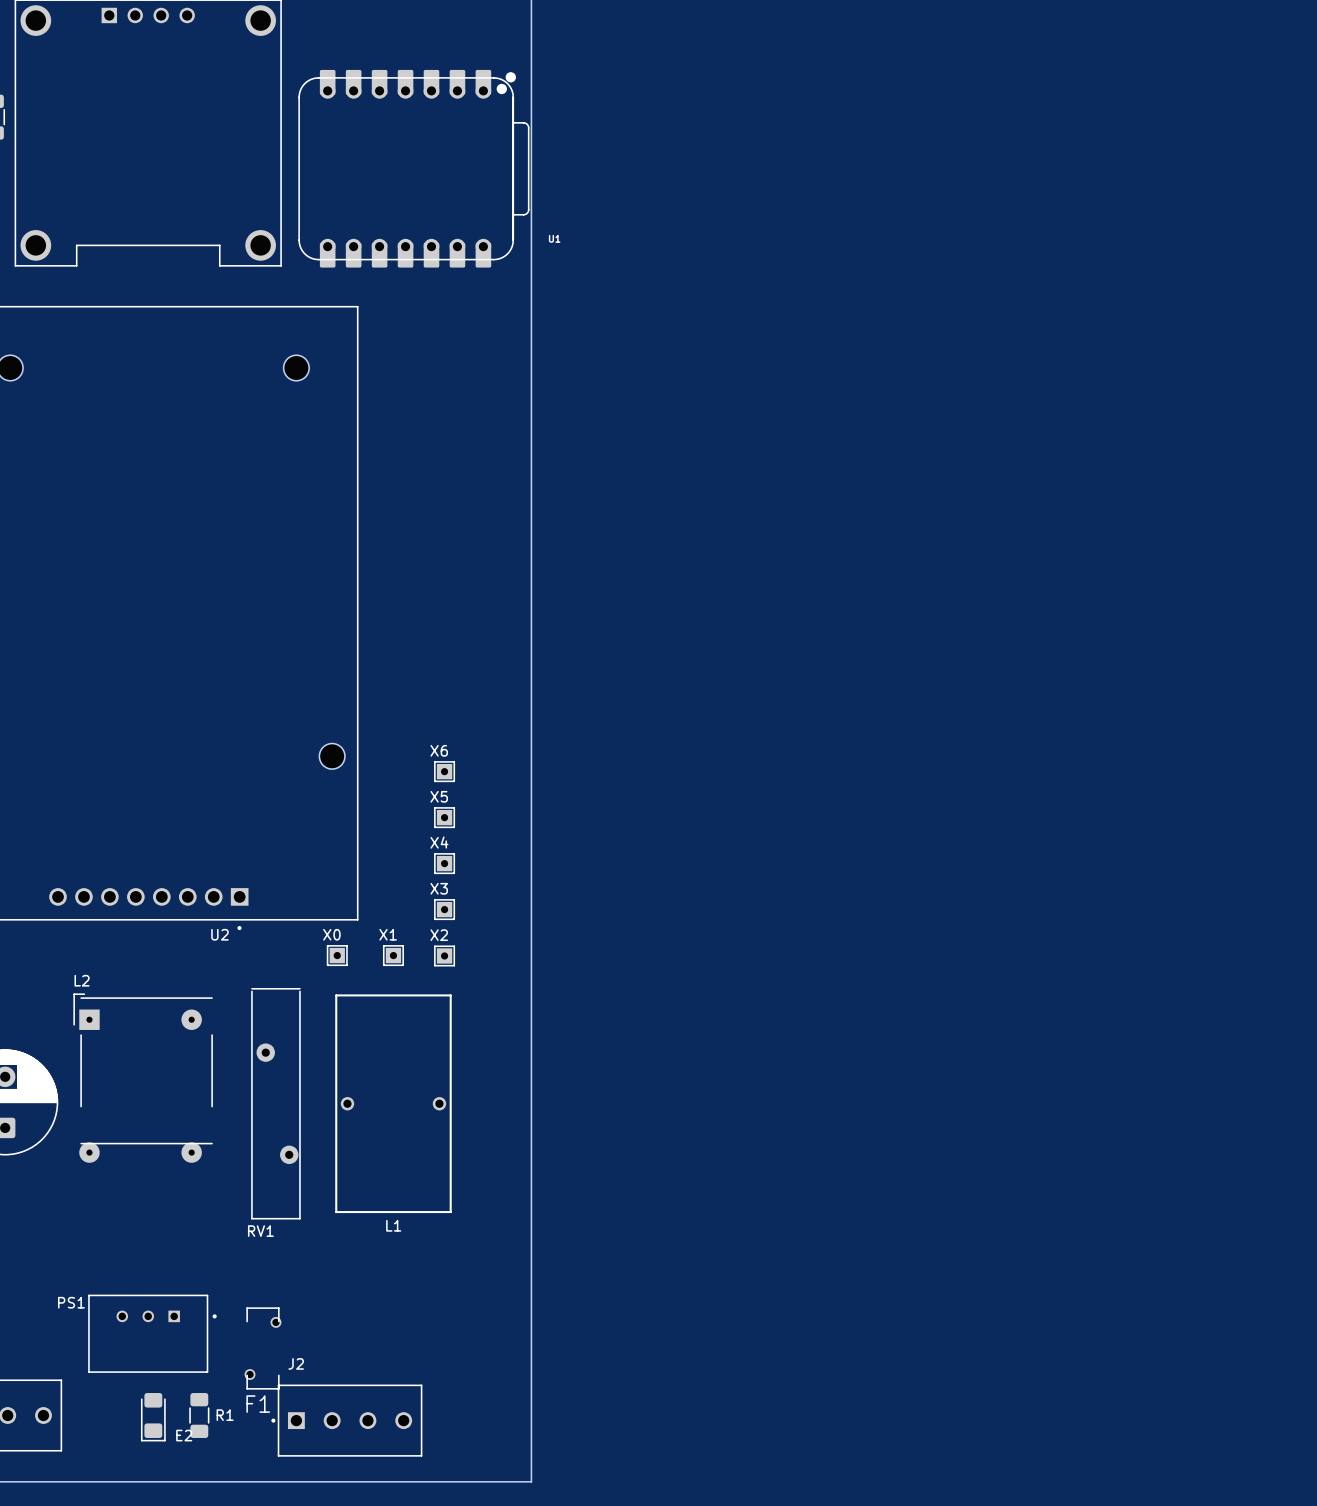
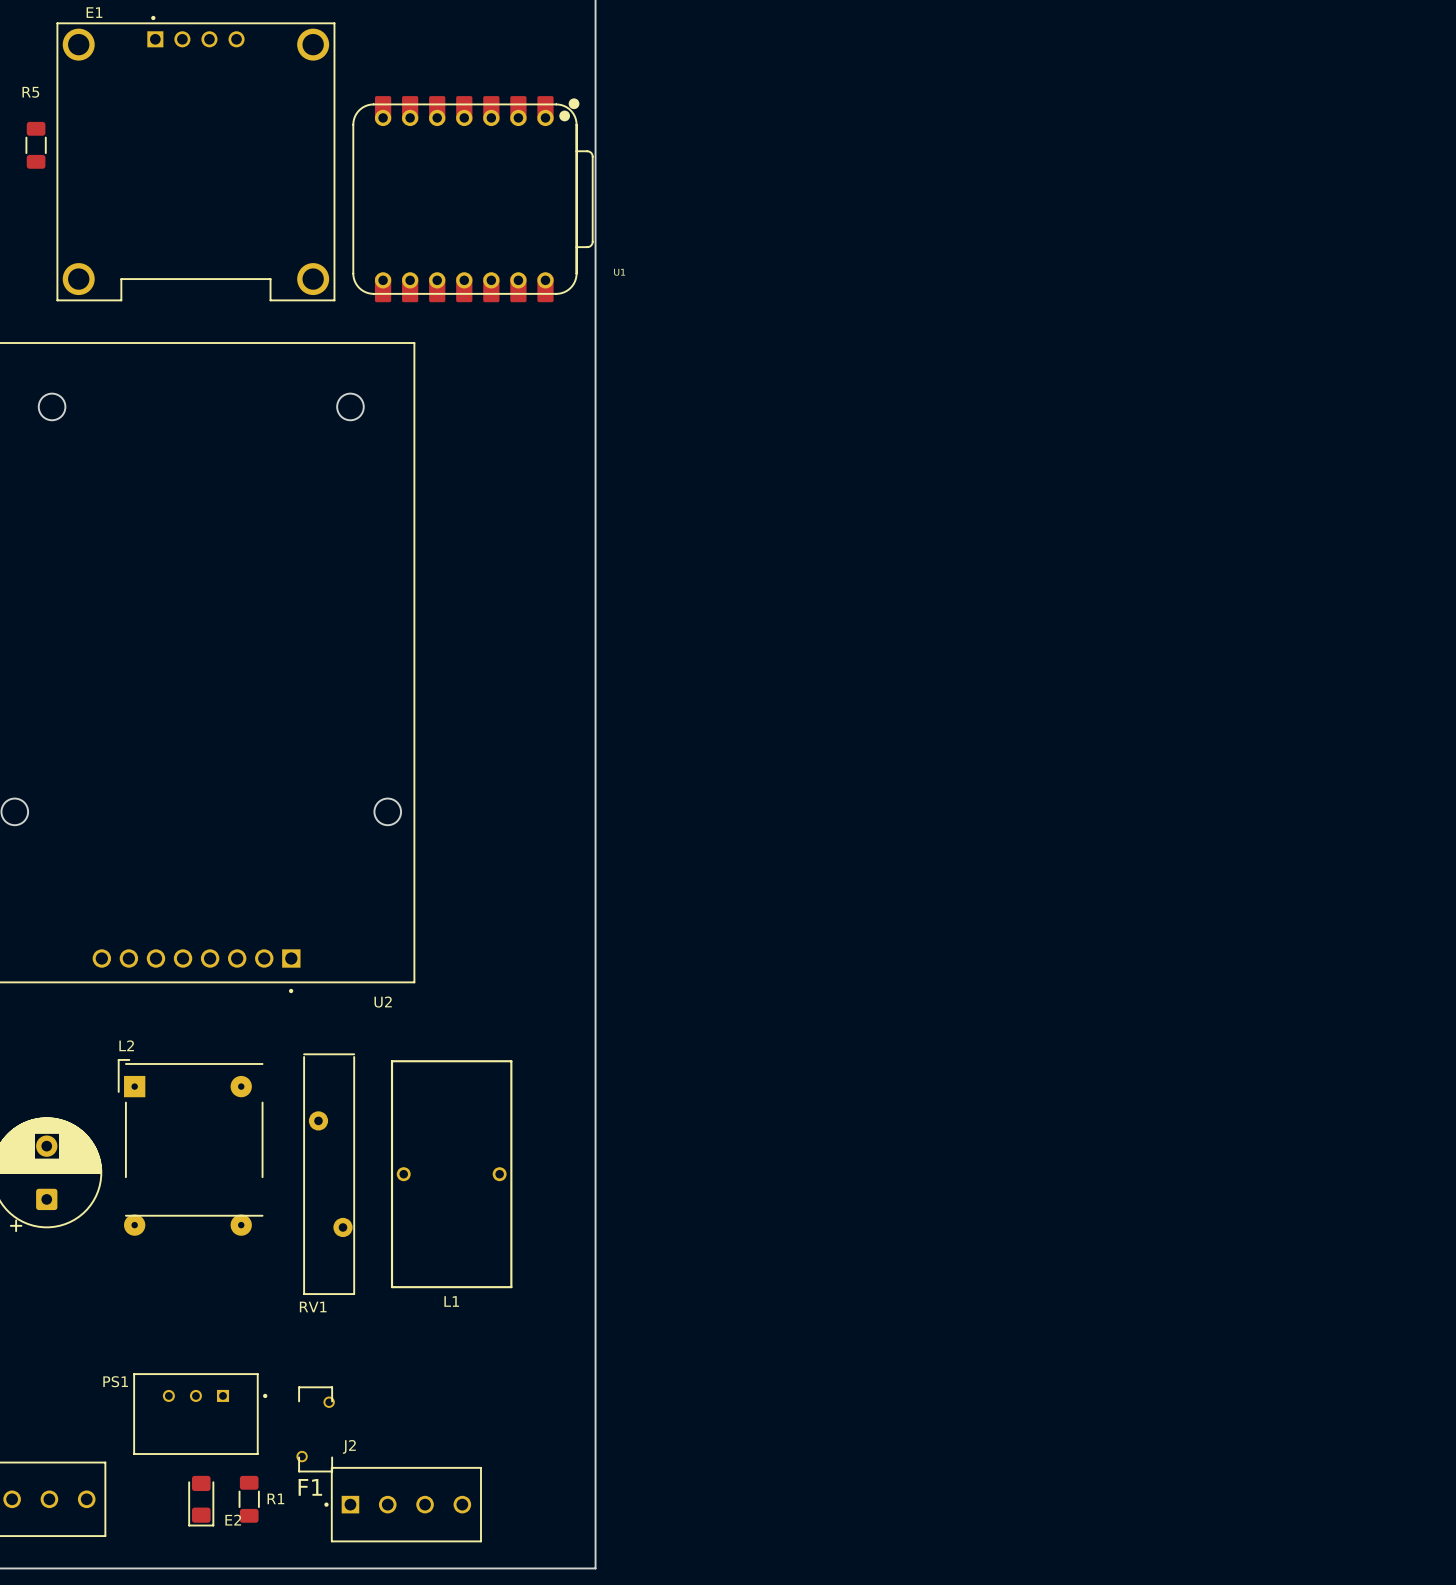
X6: (444, 771) -> none
X5: (444, 817) -> none
X4: (444, 863) -> none
X3: (444, 909) -> none
U2 name position: U2 (220, 934) -> U2 (383, 1002)
X0: (337, 955) -> none
X1: (393, 955) -> none
X2: (444, 955) -> none

